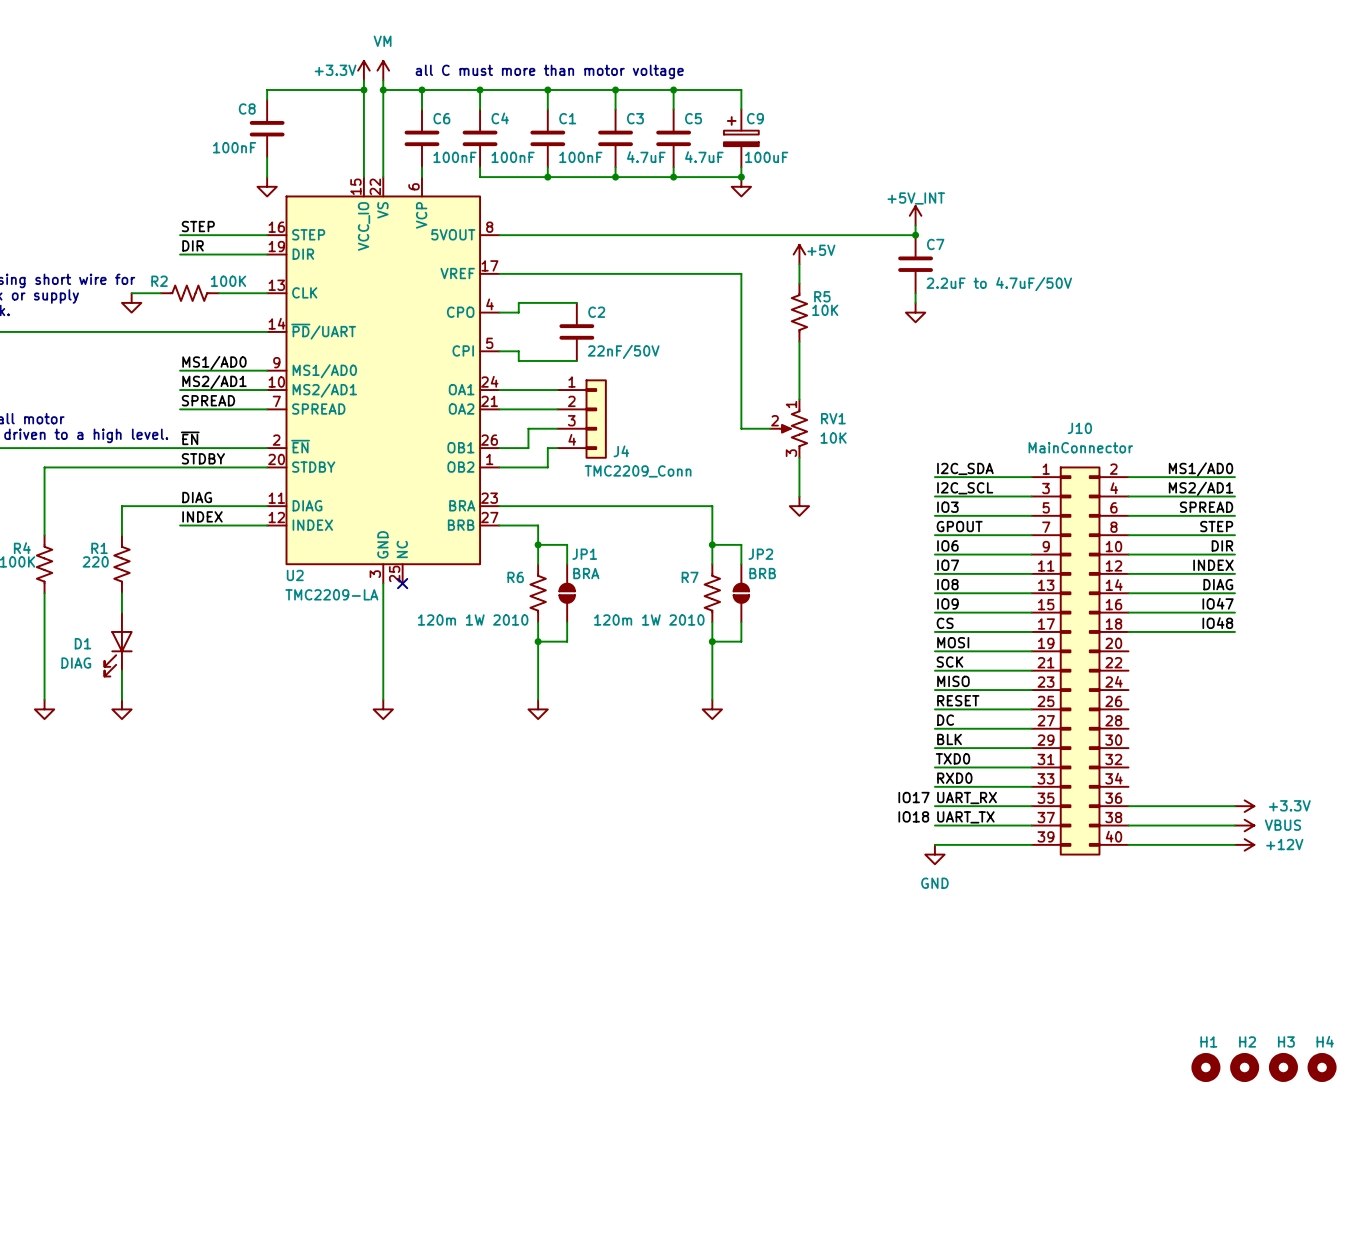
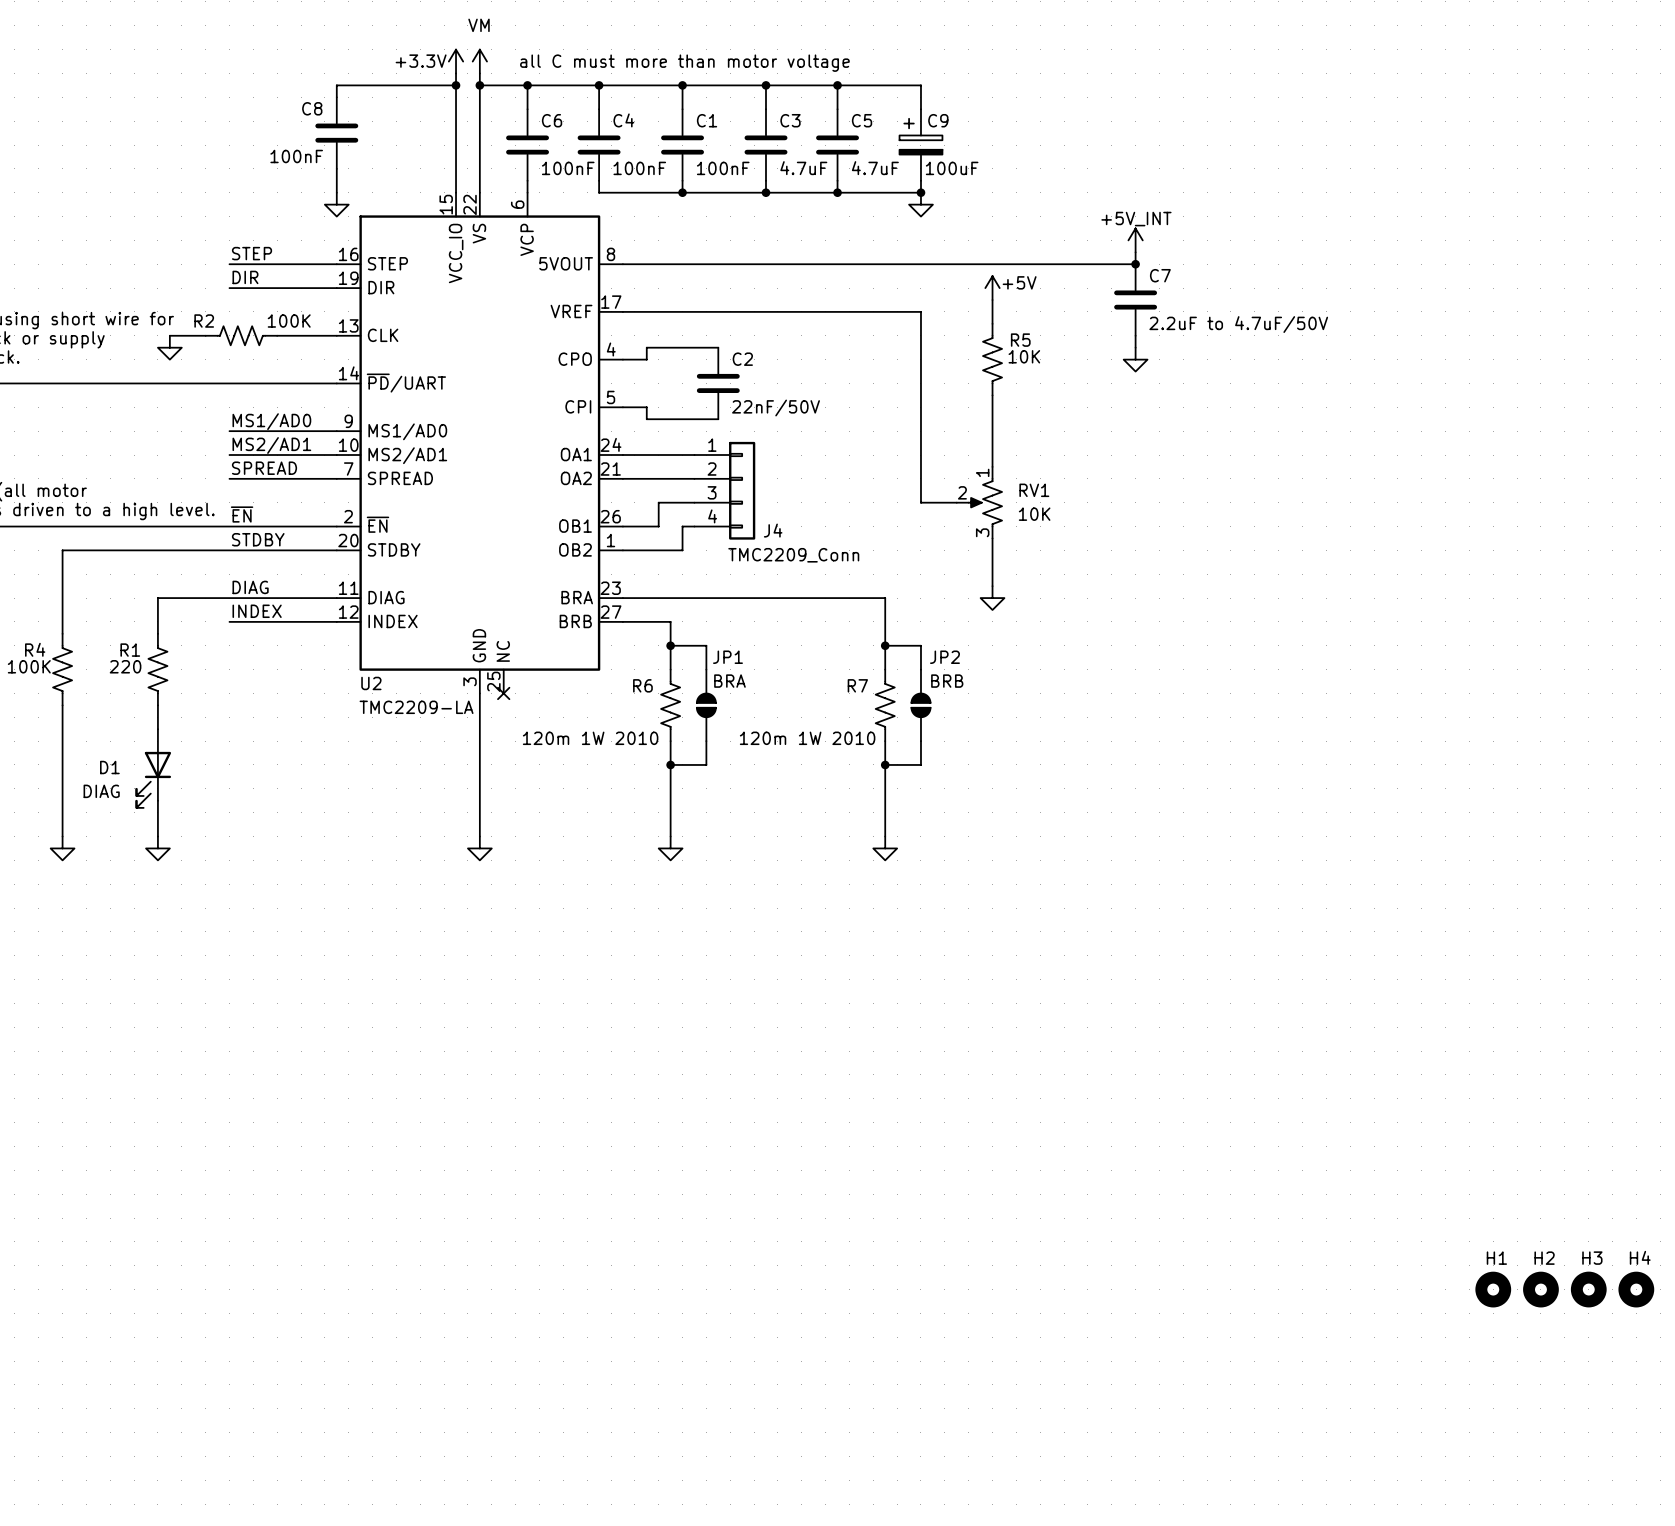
label: I2C_SDA (965, 468) -> none
label: MS1/AD0 (1201, 469) -> none
wire: (934, 477) (1031, 477) -> none
wire: (1128, 477) (1234, 477) -> none
label: I2C_SCL (965, 488) -> none
label: MS2/AD1 (1201, 488) -> none
wire: (934, 496) (1031, 496) -> none
wire: (1128, 496) (1234, 496) -> none
label: IO3 (947, 507) -> none
label: SPREAD (1206, 507) -> none
wire: (934, 515) (1031, 515) -> none
wire: (1128, 515) (1234, 515) -> none
label: GPOUT (959, 526) -> none
label: STEP (1216, 526) -> none
wire: (934, 535) (1031, 535) -> none
wire: (1128, 535) (1234, 535) -> none
label: IO6 (947, 545) -> none
label: DIR (1222, 545) -> none
wire: (934, 554) (1031, 554) -> none
wire: (1128, 554) (1234, 554) -> none
label: IO7 (948, 565) -> none
label: INDEX (1213, 565) -> none
wire: (934, 573) (1031, 573) -> none
wire: (1128, 573) (1234, 573) -> none
label: IO8 (947, 584) -> none
label: DIAG (1218, 584) -> none
wire: (934, 593) (1031, 593) -> none
wire: (1128, 593) (1234, 593) -> none
label: IO9 (947, 603) -> none
label: IO47 (1218, 603) -> none
wire: (934, 612) (1031, 612) -> none
wire: (1128, 612) (1234, 612) -> none
label: CS (945, 623) -> none
label: IO48 (1217, 623) -> none
wire: (934, 631) (1031, 631) -> none
wire: (1128, 631) (1234, 631) -> none
label: MOSI (953, 642) -> none
wire: (934, 651) (1031, 651) -> none
J10: MainConnector (1080, 661) -> none
label: SCK (949, 662) -> none
wire: (934, 670) (1031, 670) -> none
label: MISO (953, 681) -> none
wire: (934, 690) (1031, 690) -> none
label: RESET (958, 700) -> none
wire: (934, 709) (1031, 709) -> none
label: DC (945, 720) -> none
wire: (934, 728) (1031, 728) -> none
label: BLK (949, 739) -> none
wire: (934, 748) (1031, 748) -> none
label: TXD0 (952, 758) -> none
wire: (934, 767) (1031, 767) -> none
label: RXD0 (954, 778) -> none
wire: (934, 786) (1031, 786) -> none
label: IO17 (914, 797) -> none
label: UART_RX (967, 798) -> none
wire: (934, 806) (1031, 806) -> none
wire: (1128, 806) (1234, 806) -> none
power symbol: +3.3V (1244, 806) -> none
label: IO18 (913, 816) -> none
label: UART_TX (965, 817) -> none
wire: (934, 825) (1031, 825) -> none
wire: (1128, 825) (1234, 825) -> none
power symbol: VBUS (1244, 825) -> none
wire: (934, 844) (1031, 844) -> none
wire: (1128, 844) (1234, 844) -> none
power symbol: +12V (1244, 844) -> none
power symbol: GND (934, 854) -> none

